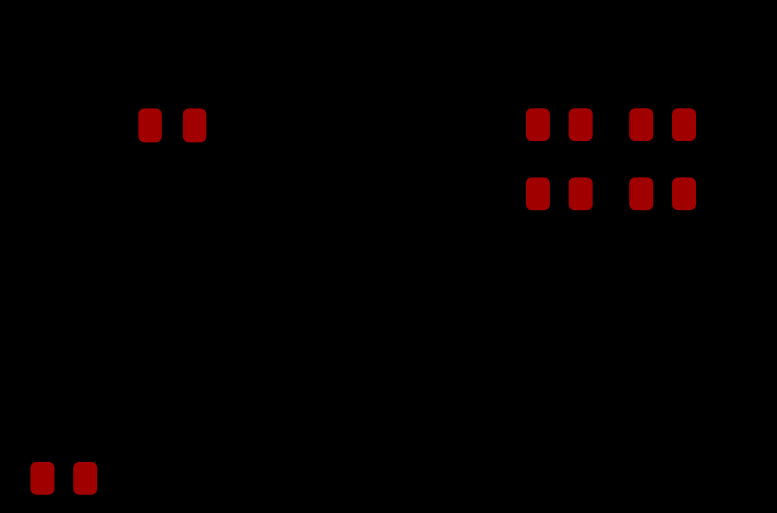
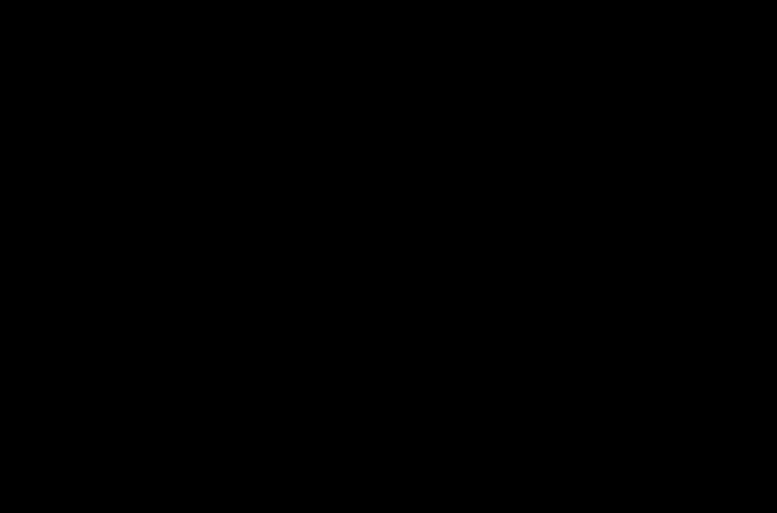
part: (559, 124) -> none
part: (662, 124) -> none
part: (172, 125) -> none
part: (559, 193) -> none
part: (662, 193) -> none
part: (63, 478) -> none

